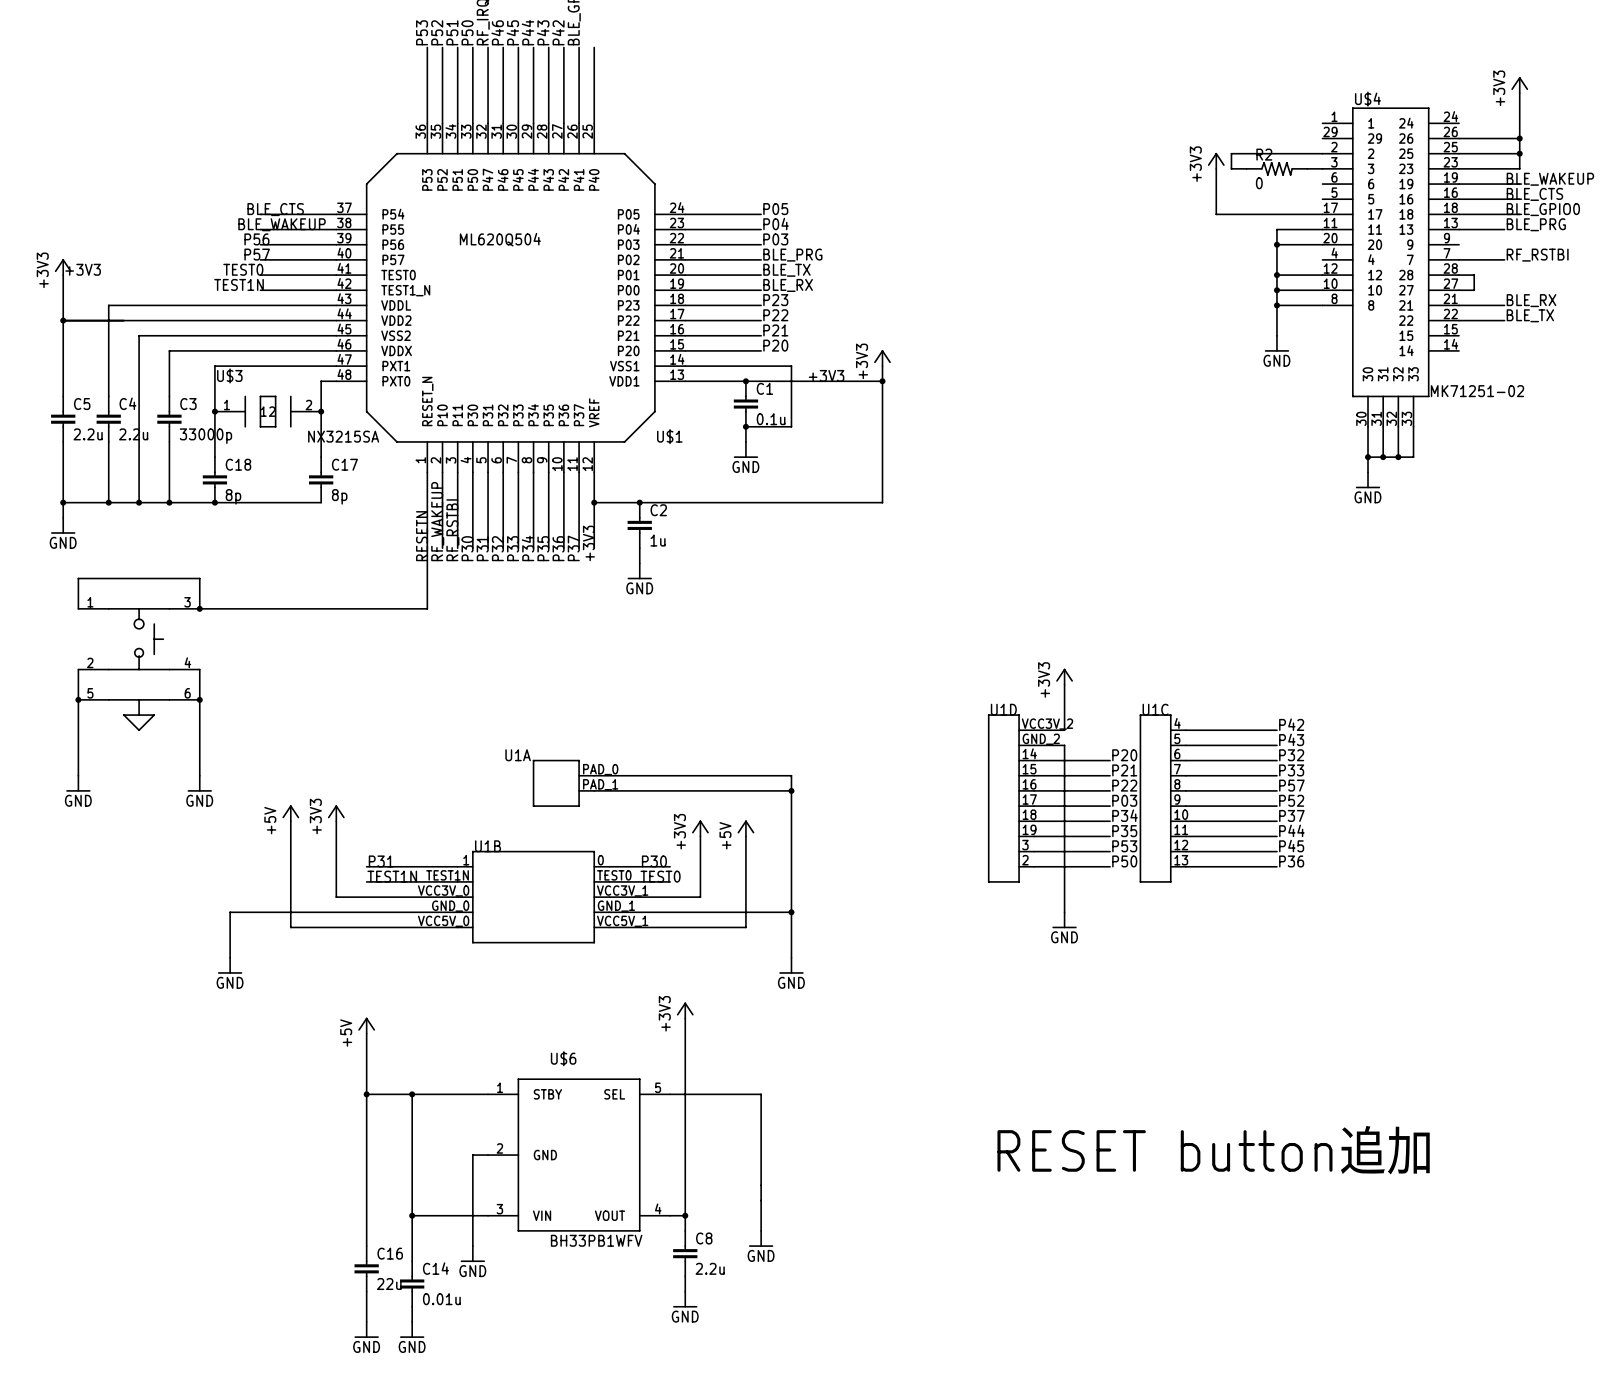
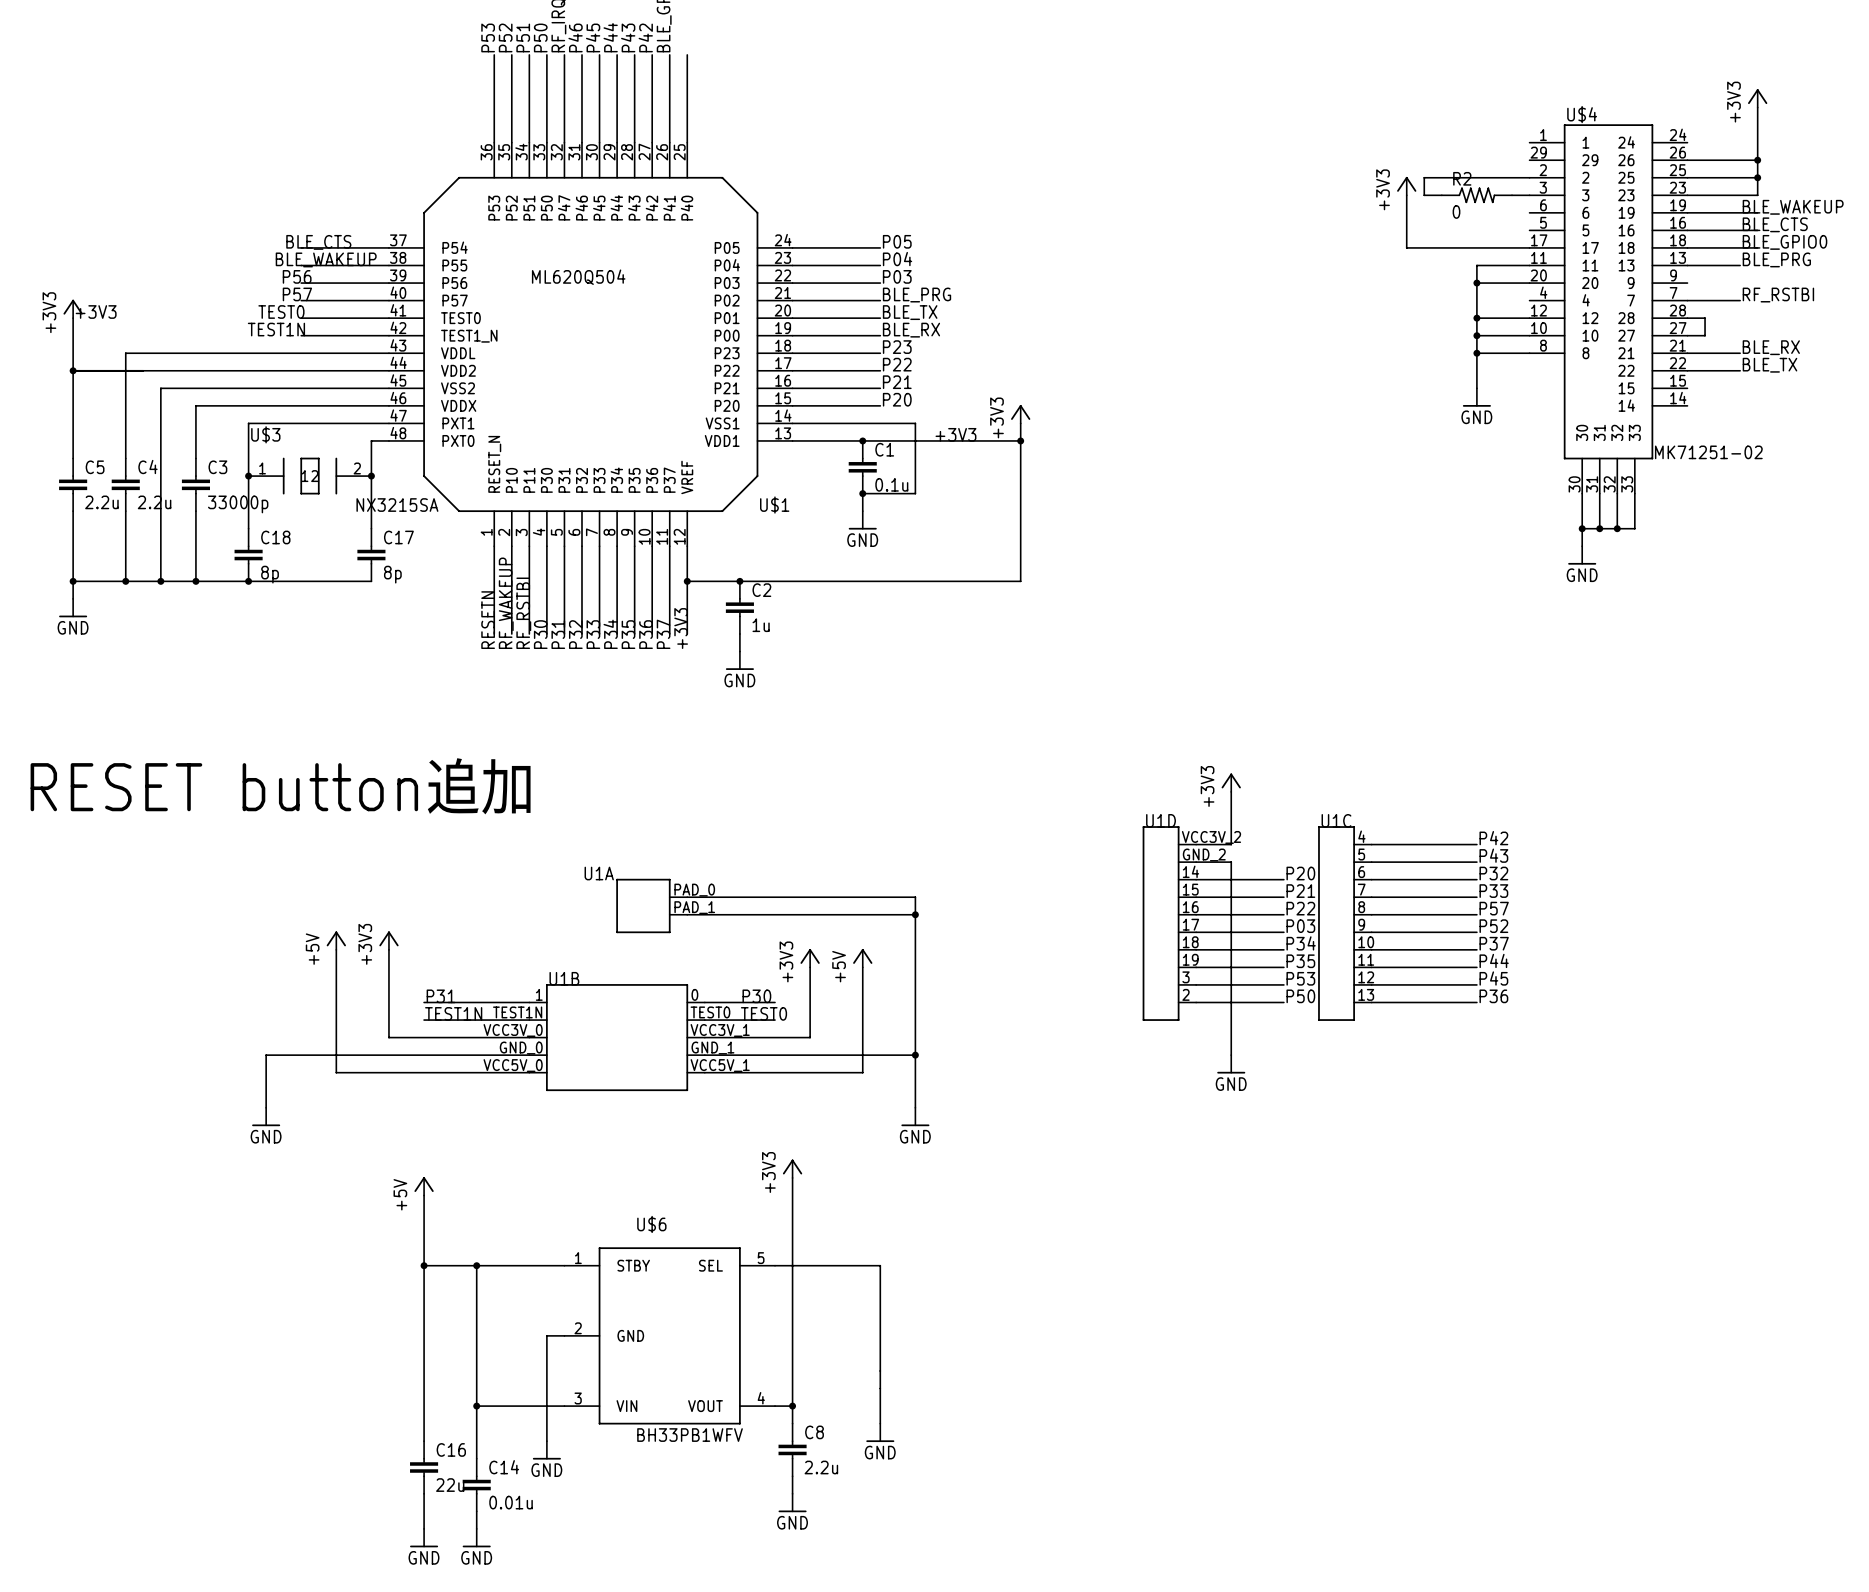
wire: (427, 548) (427, 608) (199, 608) (199, 578) (78, 578) (78, 608) -> none
junction: (199, 608) -> none
wire: (78, 669) (78, 775) -> none
part: (139, 669) -> none
wire: (199, 669) (199, 775) -> none
text: none -> RESET button追加 (281, 786)
junction: (78, 699) -> none
junction: (199, 699) -> none
power symbol: GND (78, 783) -> none
power symbol: GND (199, 783) -> none
text: RESET button追加 (1214, 1150) -> none

